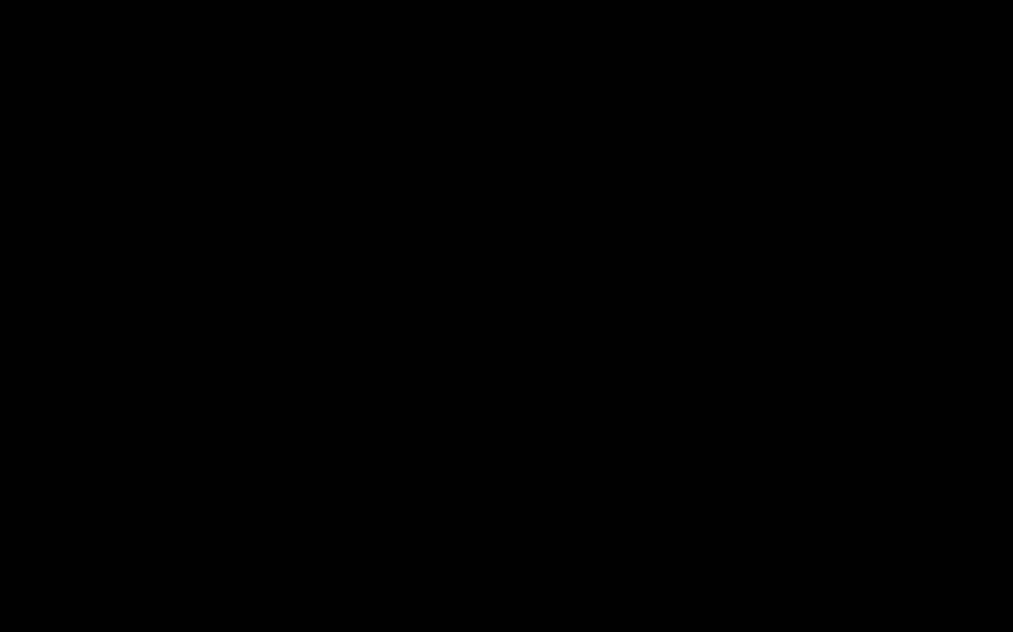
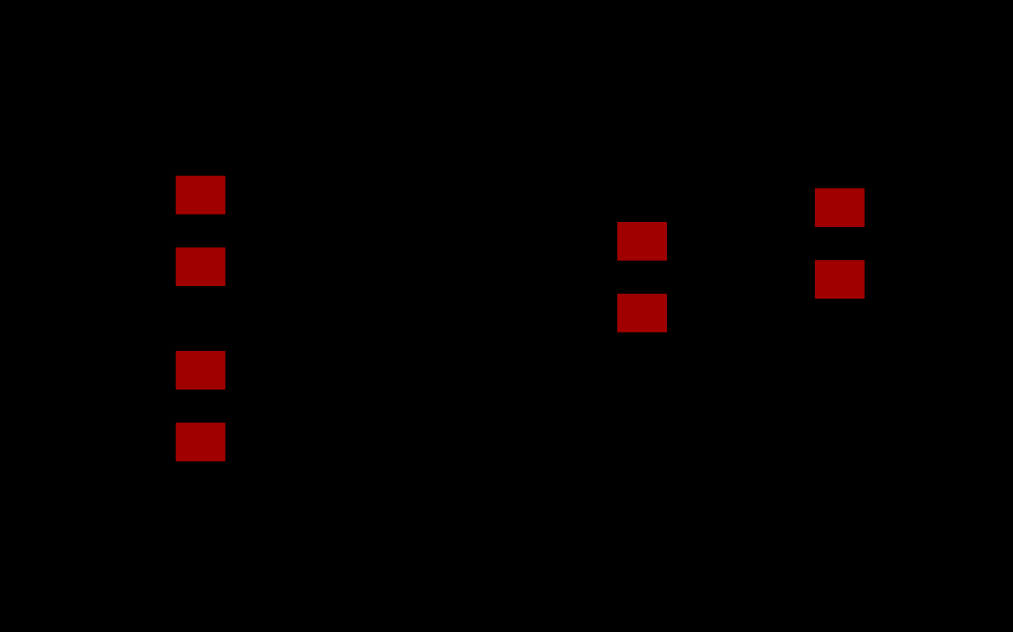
part: none -> (200, 230)
part: none -> (839, 243)
part: none -> (642, 277)
part: none -> (200, 406)

